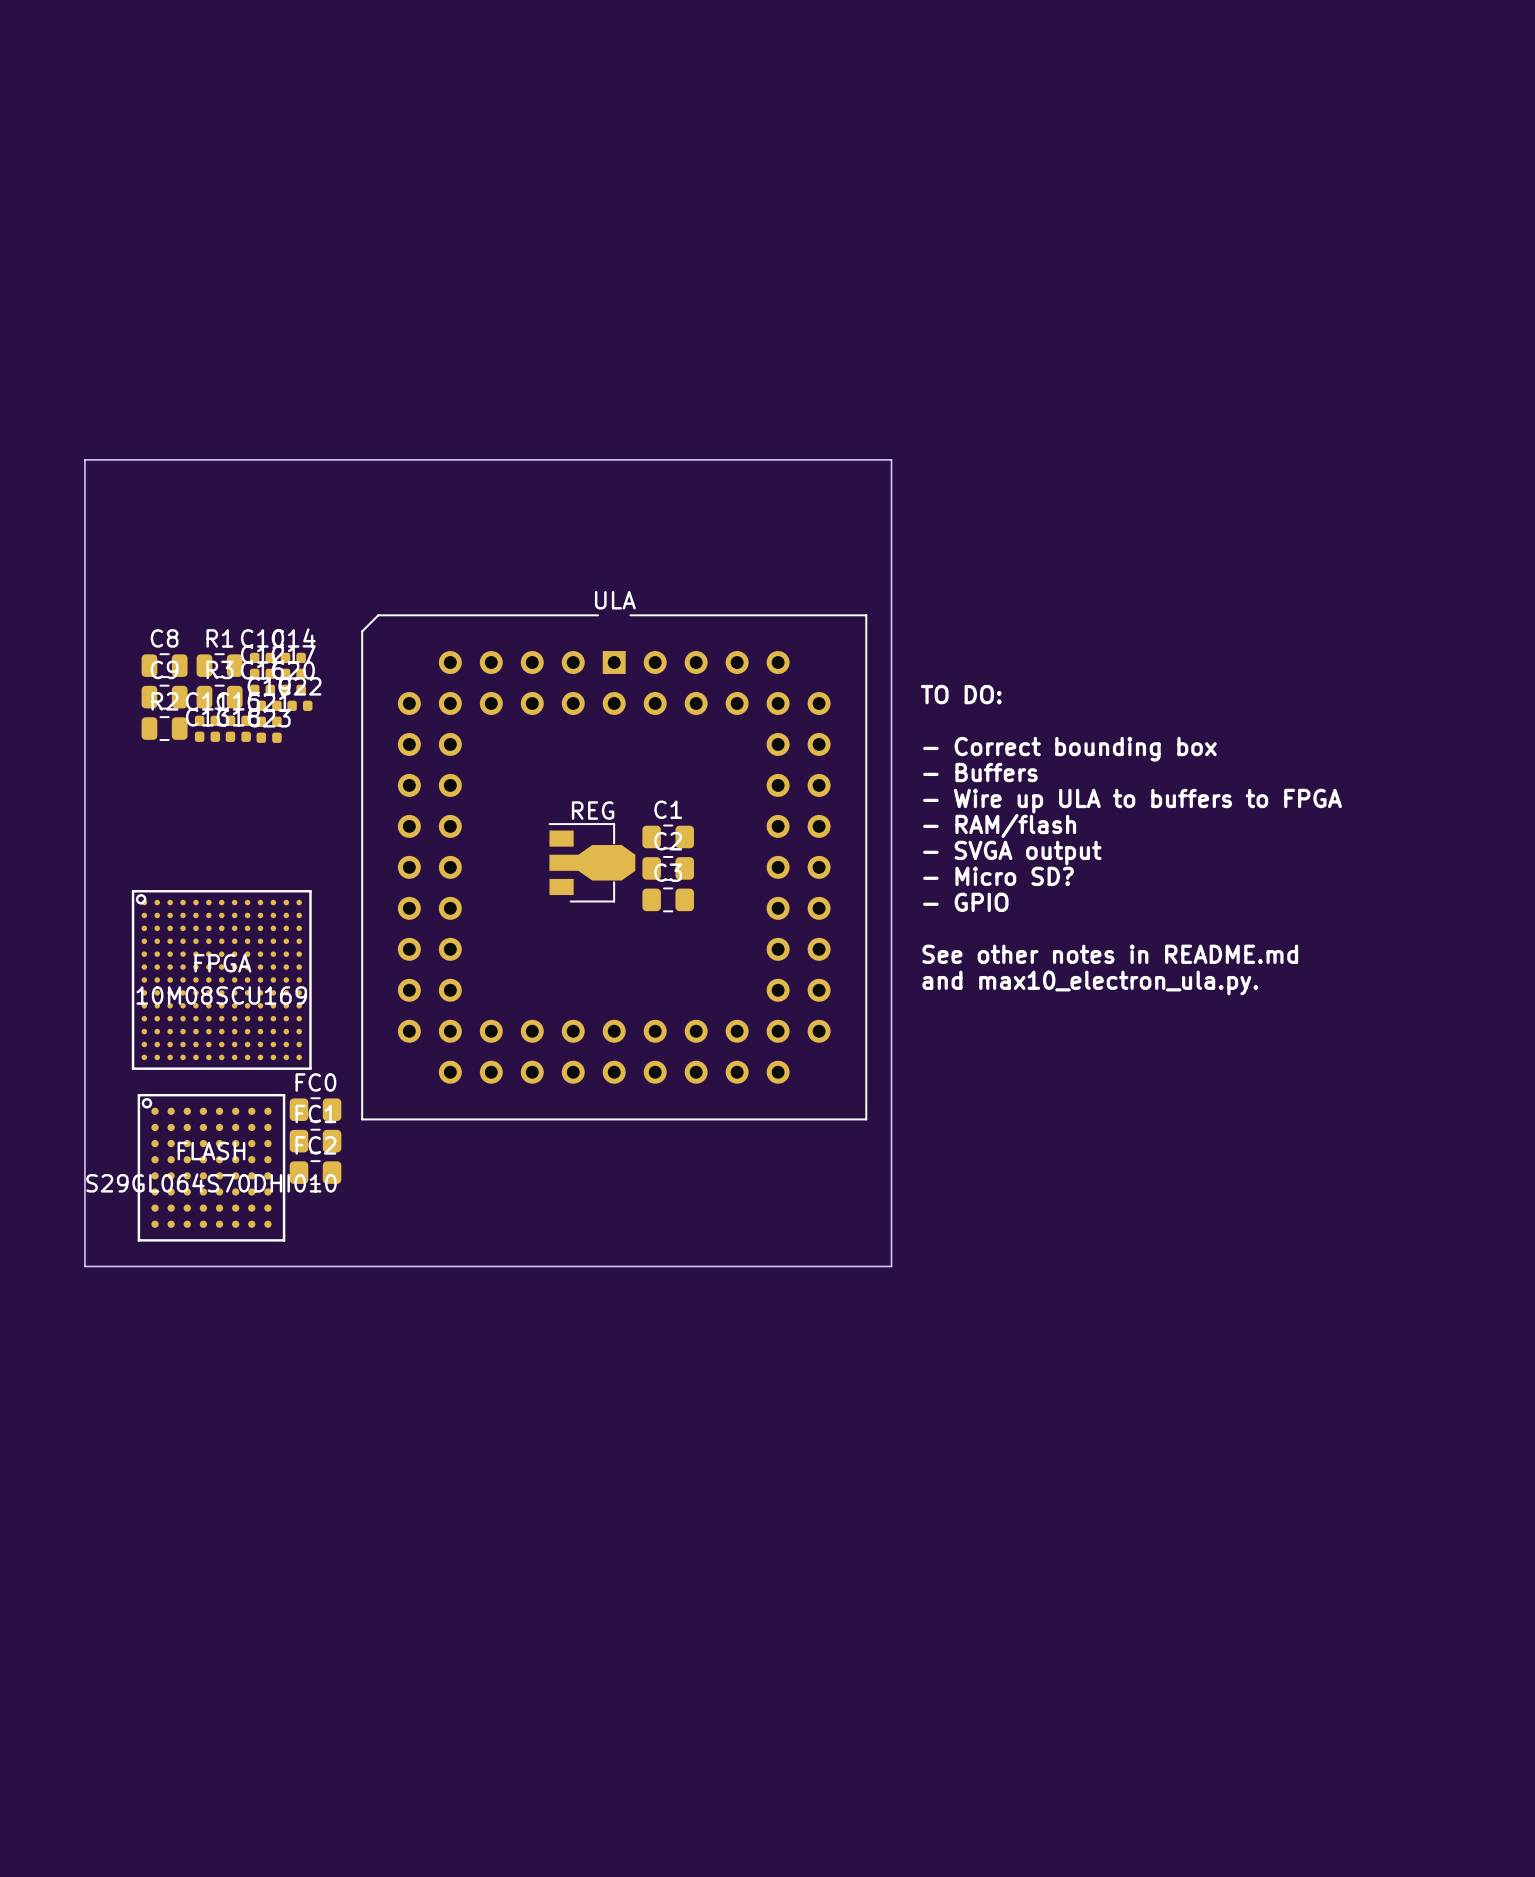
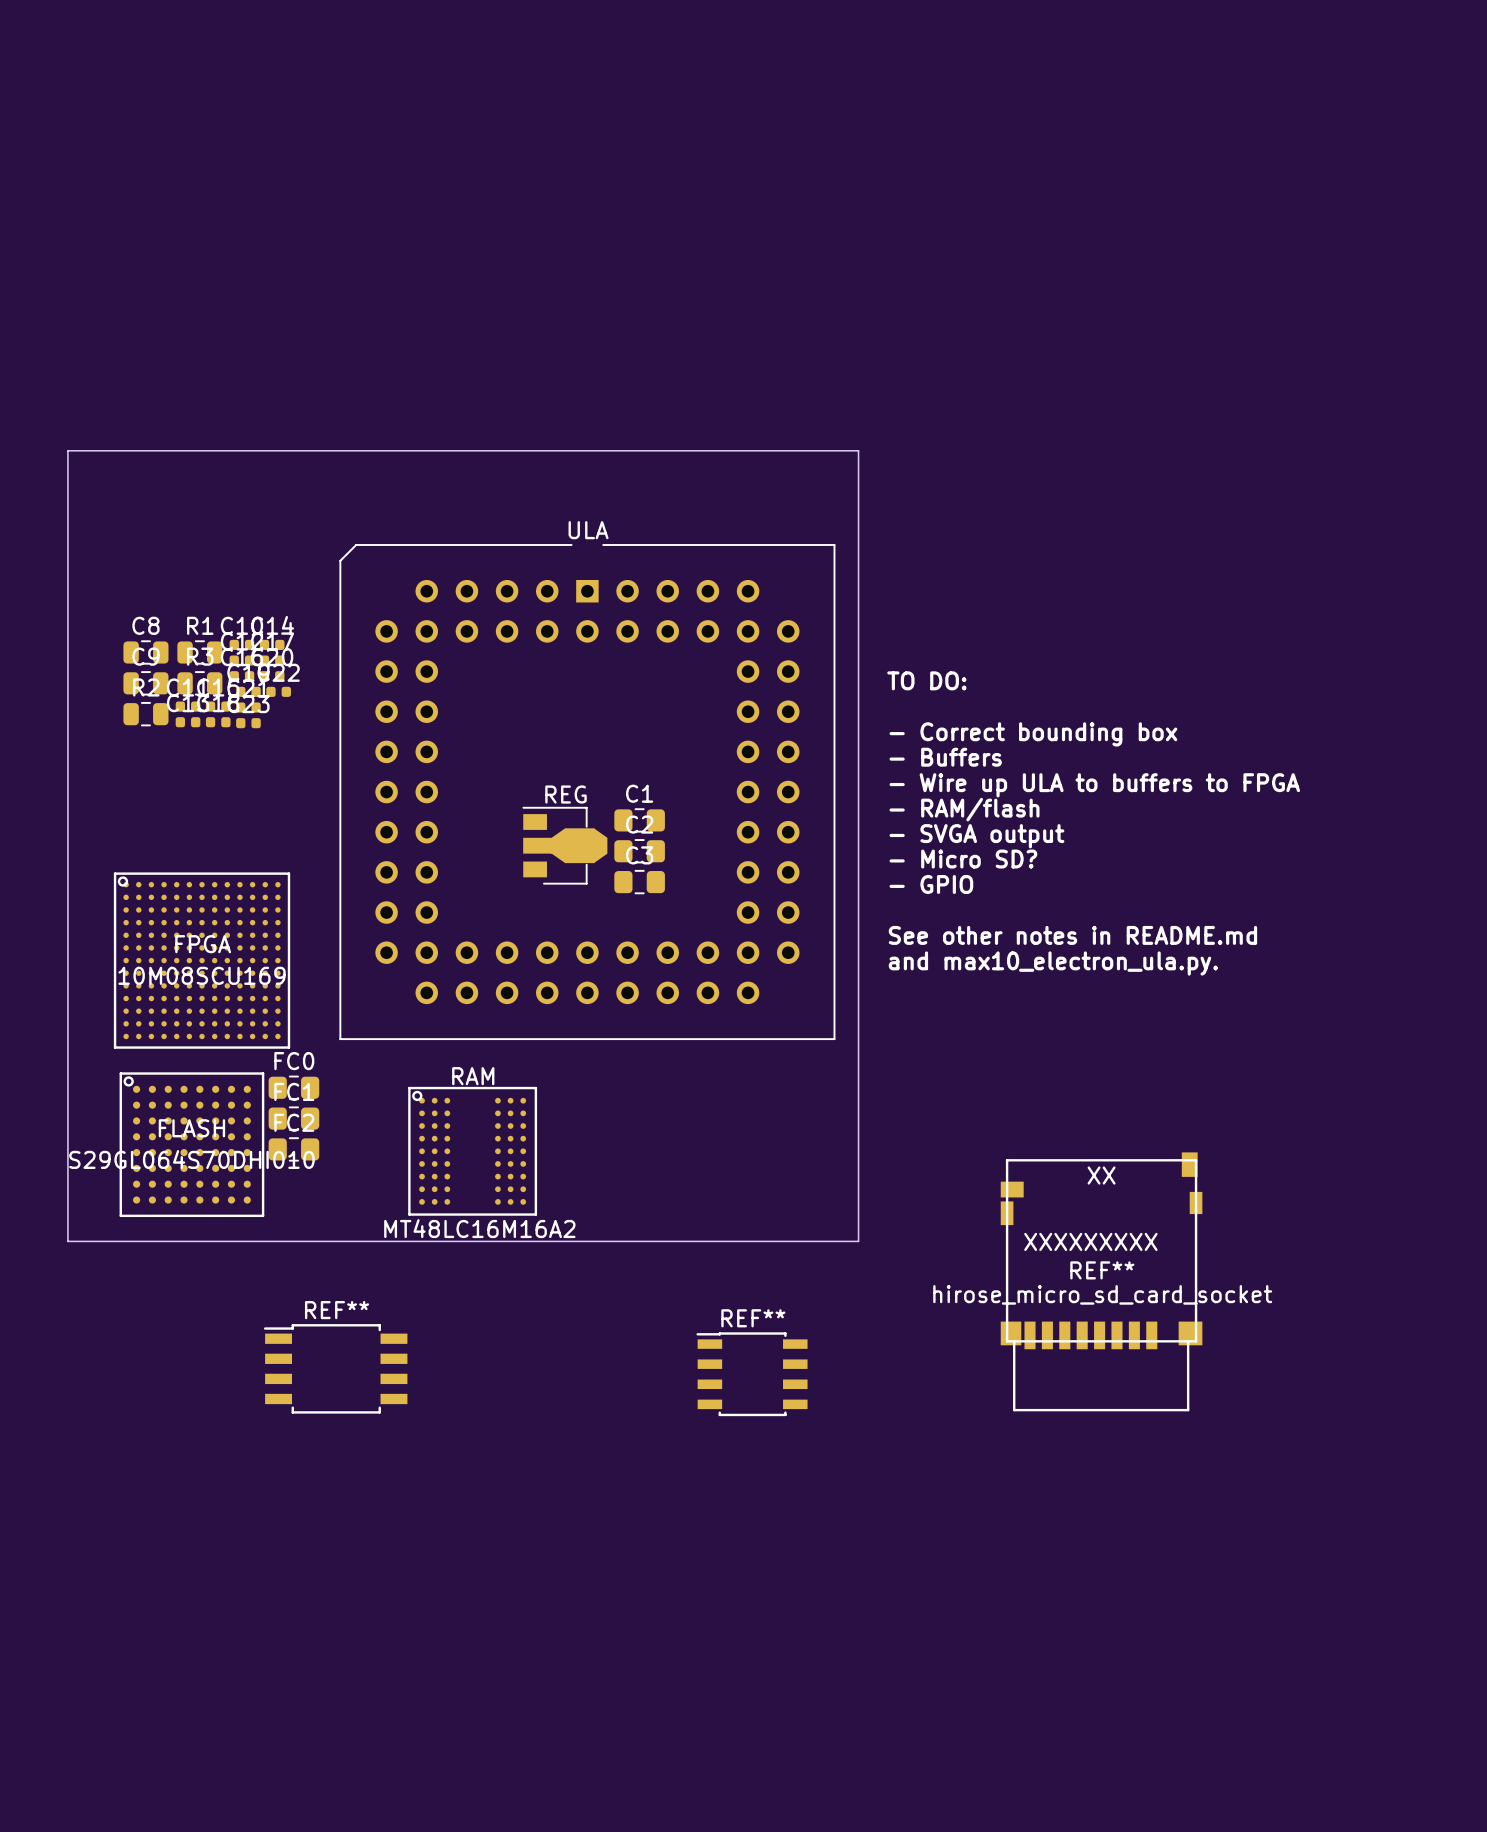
ULA position: (614, 867) -> (587, 792)
RAM: none -> MT48LC16M16A2 (472, 1151)
REF**: none -> hirose_micro_sd_card_socket (1101, 1281)
REF**: none -> (335, 1368)
REF**: none -> (752, 1374)

